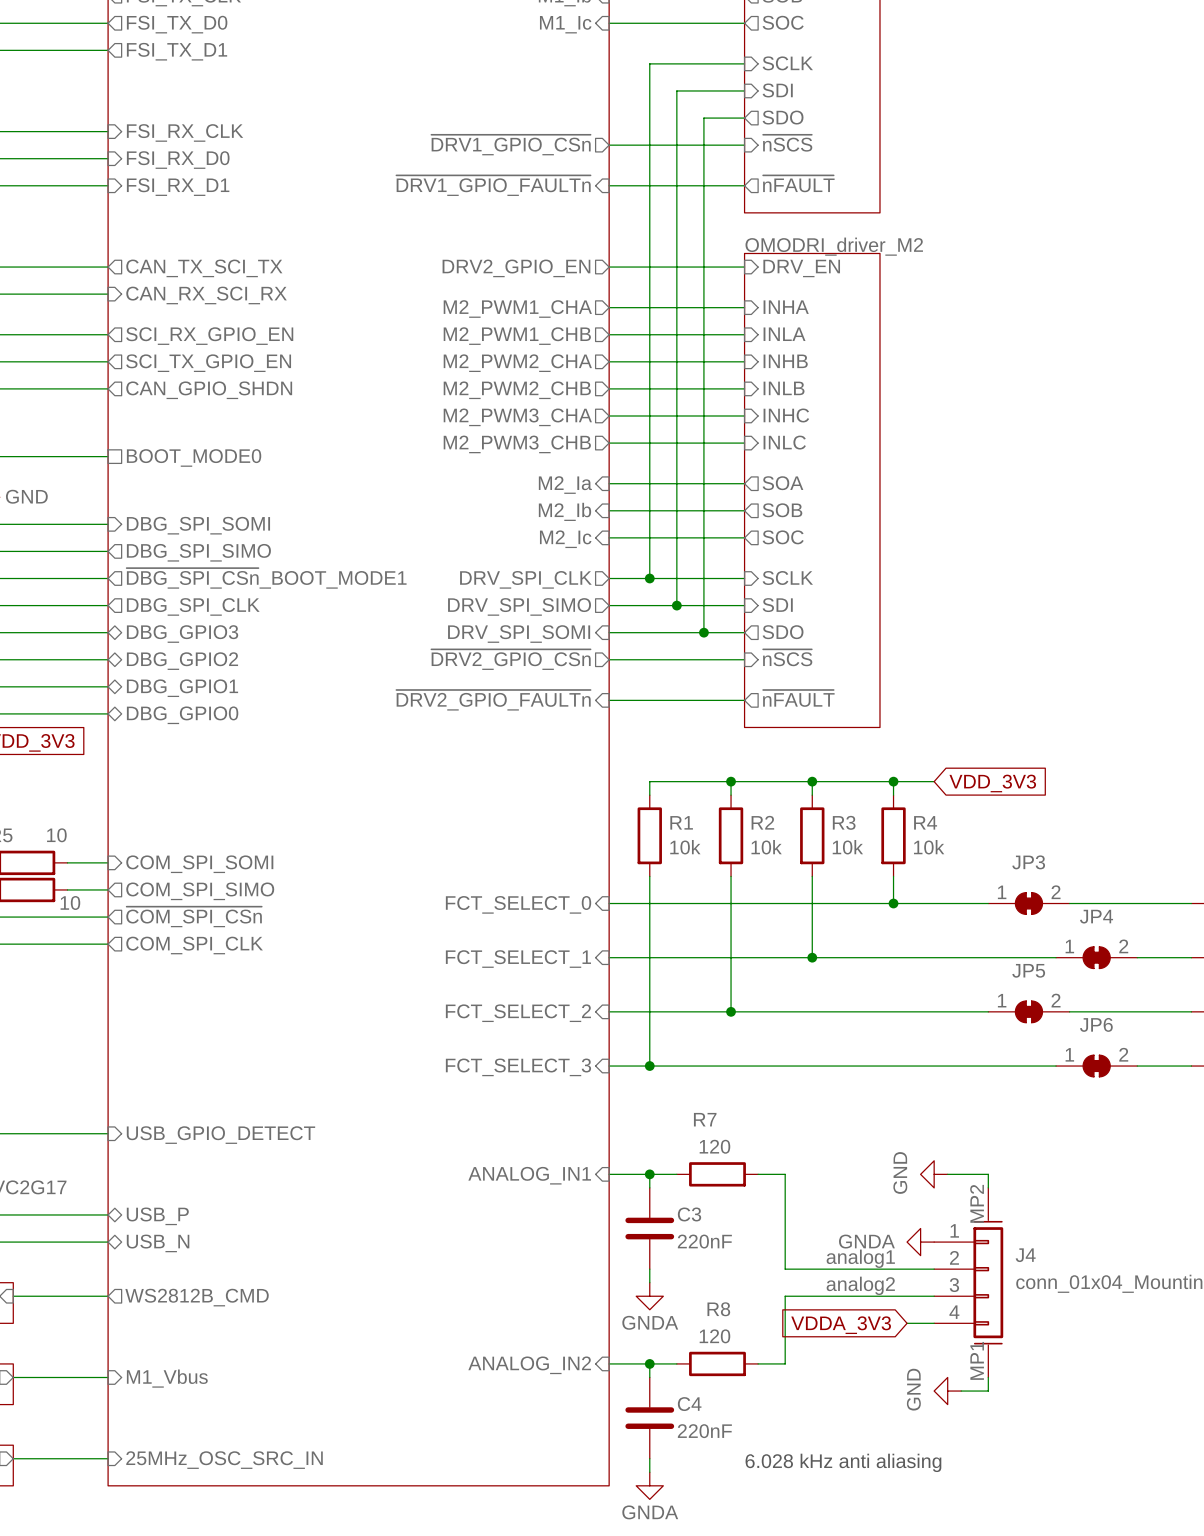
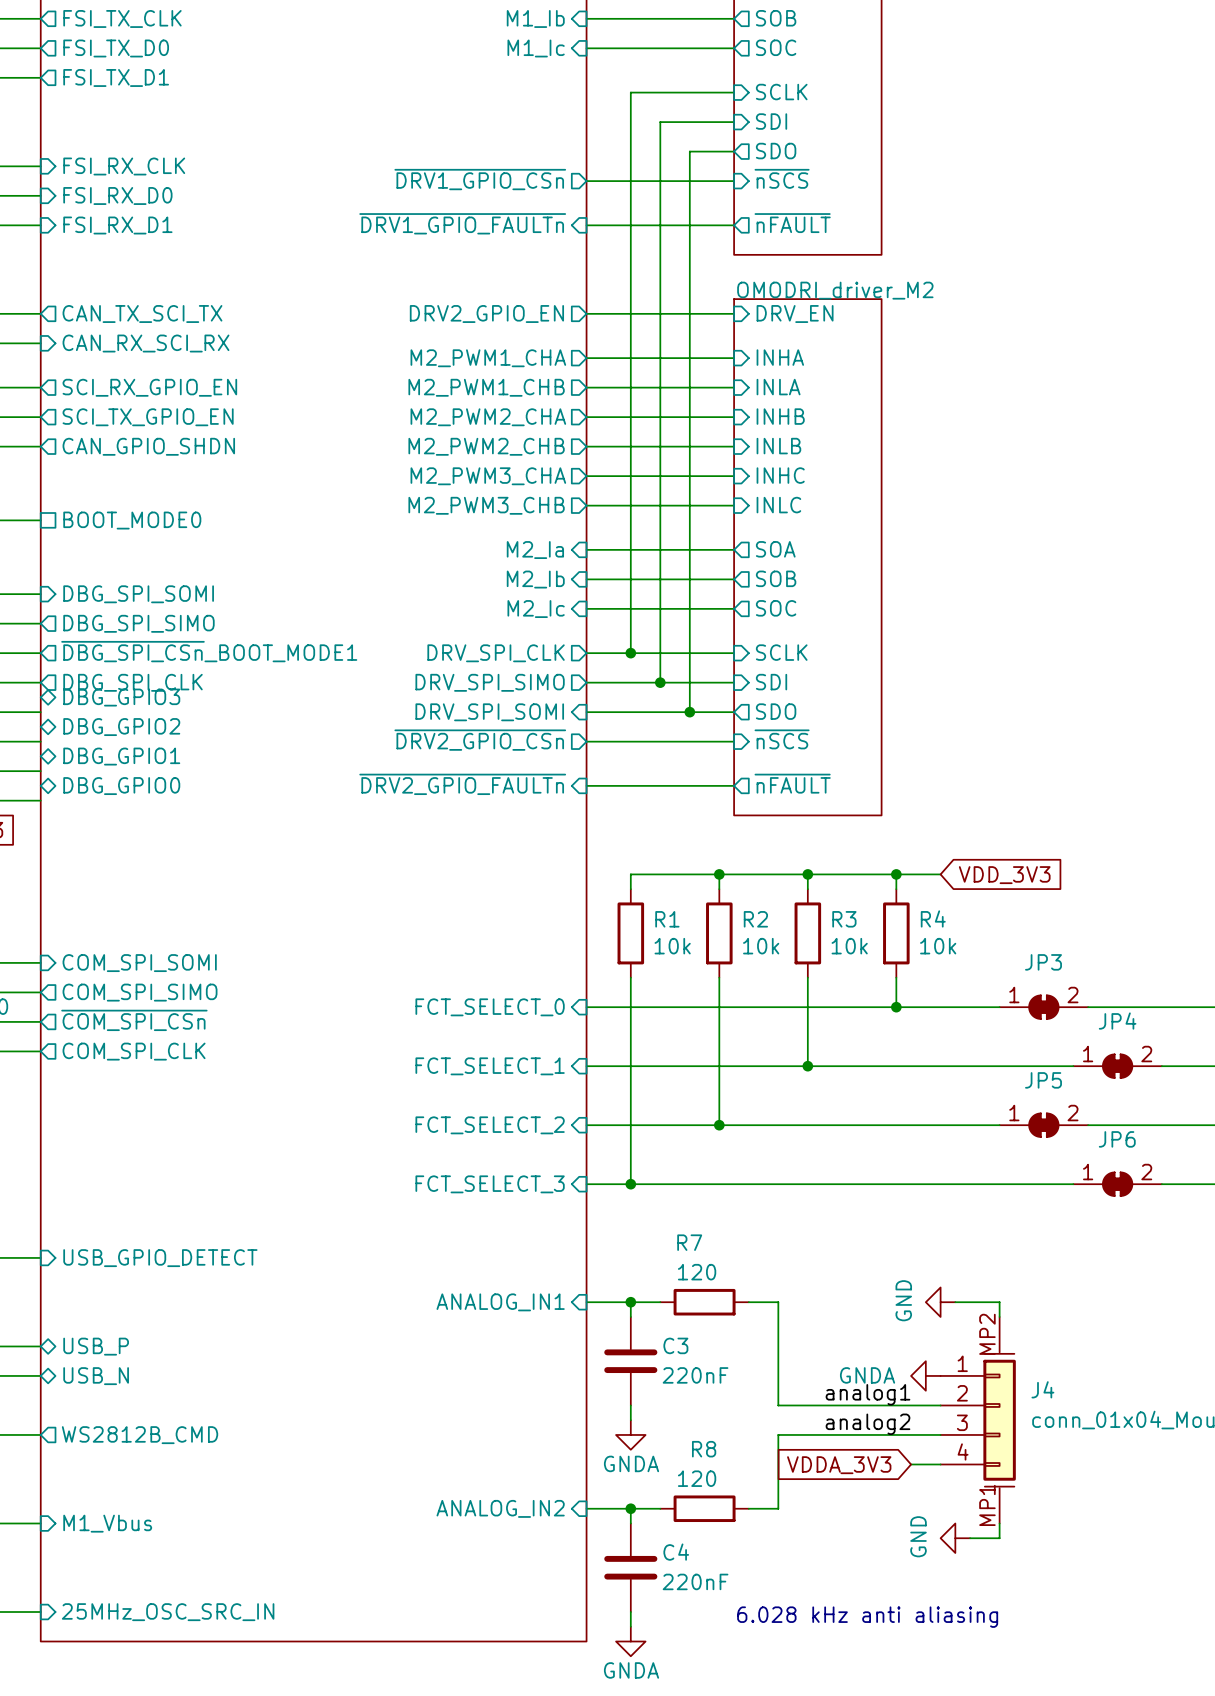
sheet pin position: DBG_GPIO3 (182, 634) -> DBG_GPIO3 (121, 697)
sheet pin position: DBG_GPIO2 (182, 661) -> DBG_GPIO2 (121, 727)
sheet pin position: DBG_GPIO1 (182, 688) -> DBG_GPIO1 (121, 756)
sheet pin position: DBG_GPIO0 (182, 715) -> DBG_GPIO0 (121, 786)

